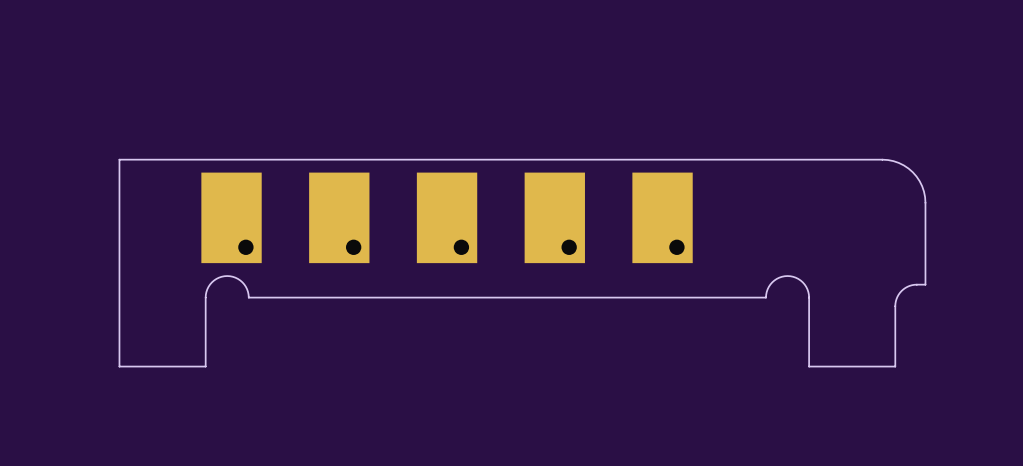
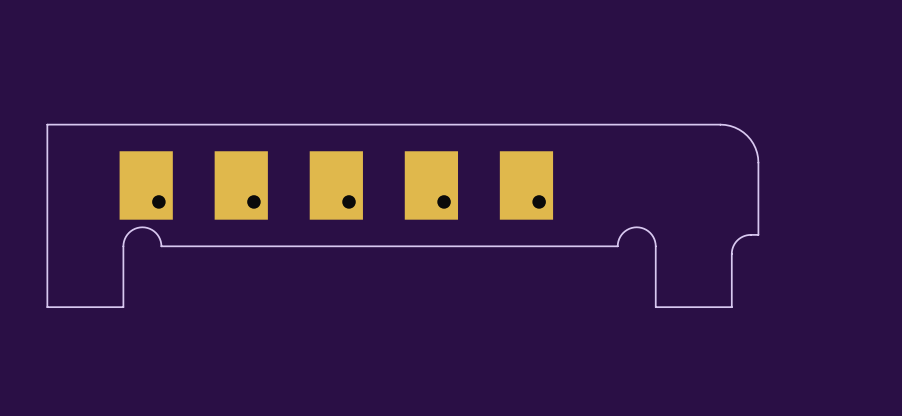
part footprint: [201, 172, 262, 264] -> [119, 151, 173, 220]
part footprint: [309, 172, 370, 264] -> [214, 151, 268, 220]
part footprint: [416, 172, 478, 264] -> [309, 151, 363, 220]
part footprint: [524, 172, 585, 264] -> [404, 151, 459, 220]
part footprint: [632, 172, 693, 264] -> [499, 151, 554, 220]

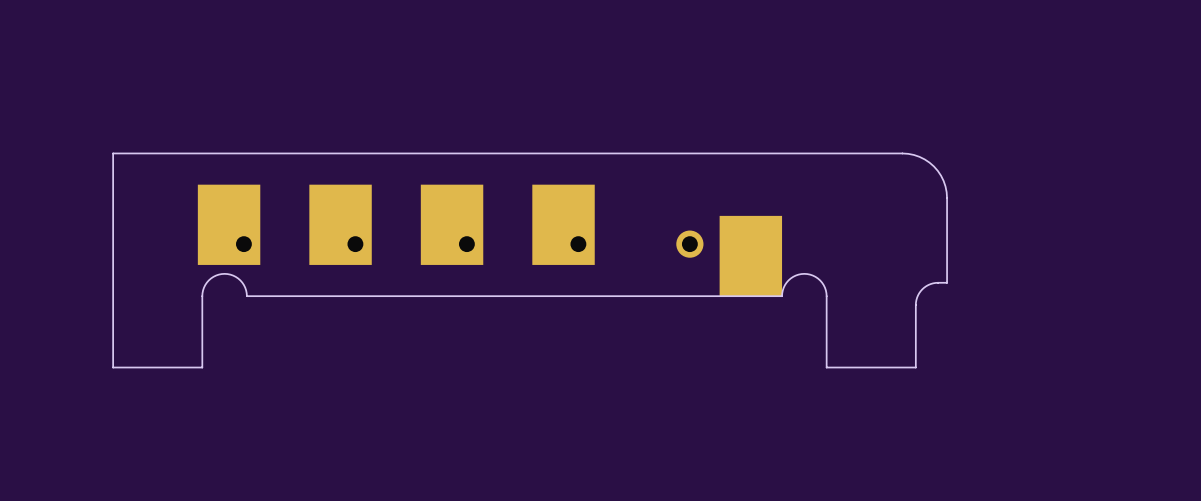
part position: (526, 185) -> (750, 256)

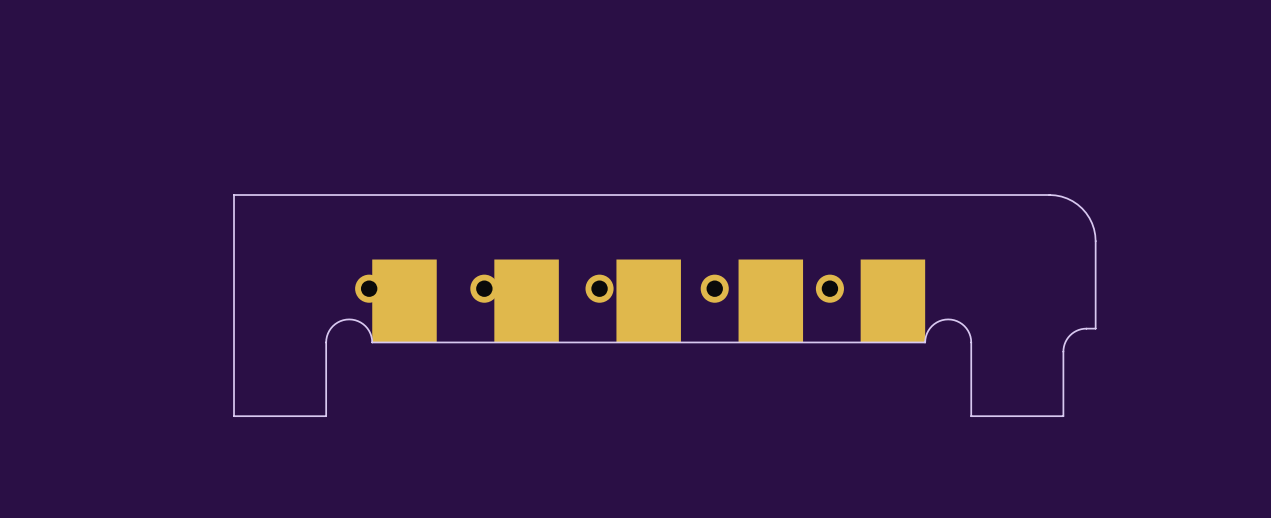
part: (229, 224) -> none
part: (340, 224) -> none
part: (452, 224) -> none
part: (563, 224) -> none
part: none -> (404, 300)
part: none -> (526, 300)
part: none -> (648, 300)
part: none -> (770, 300)

